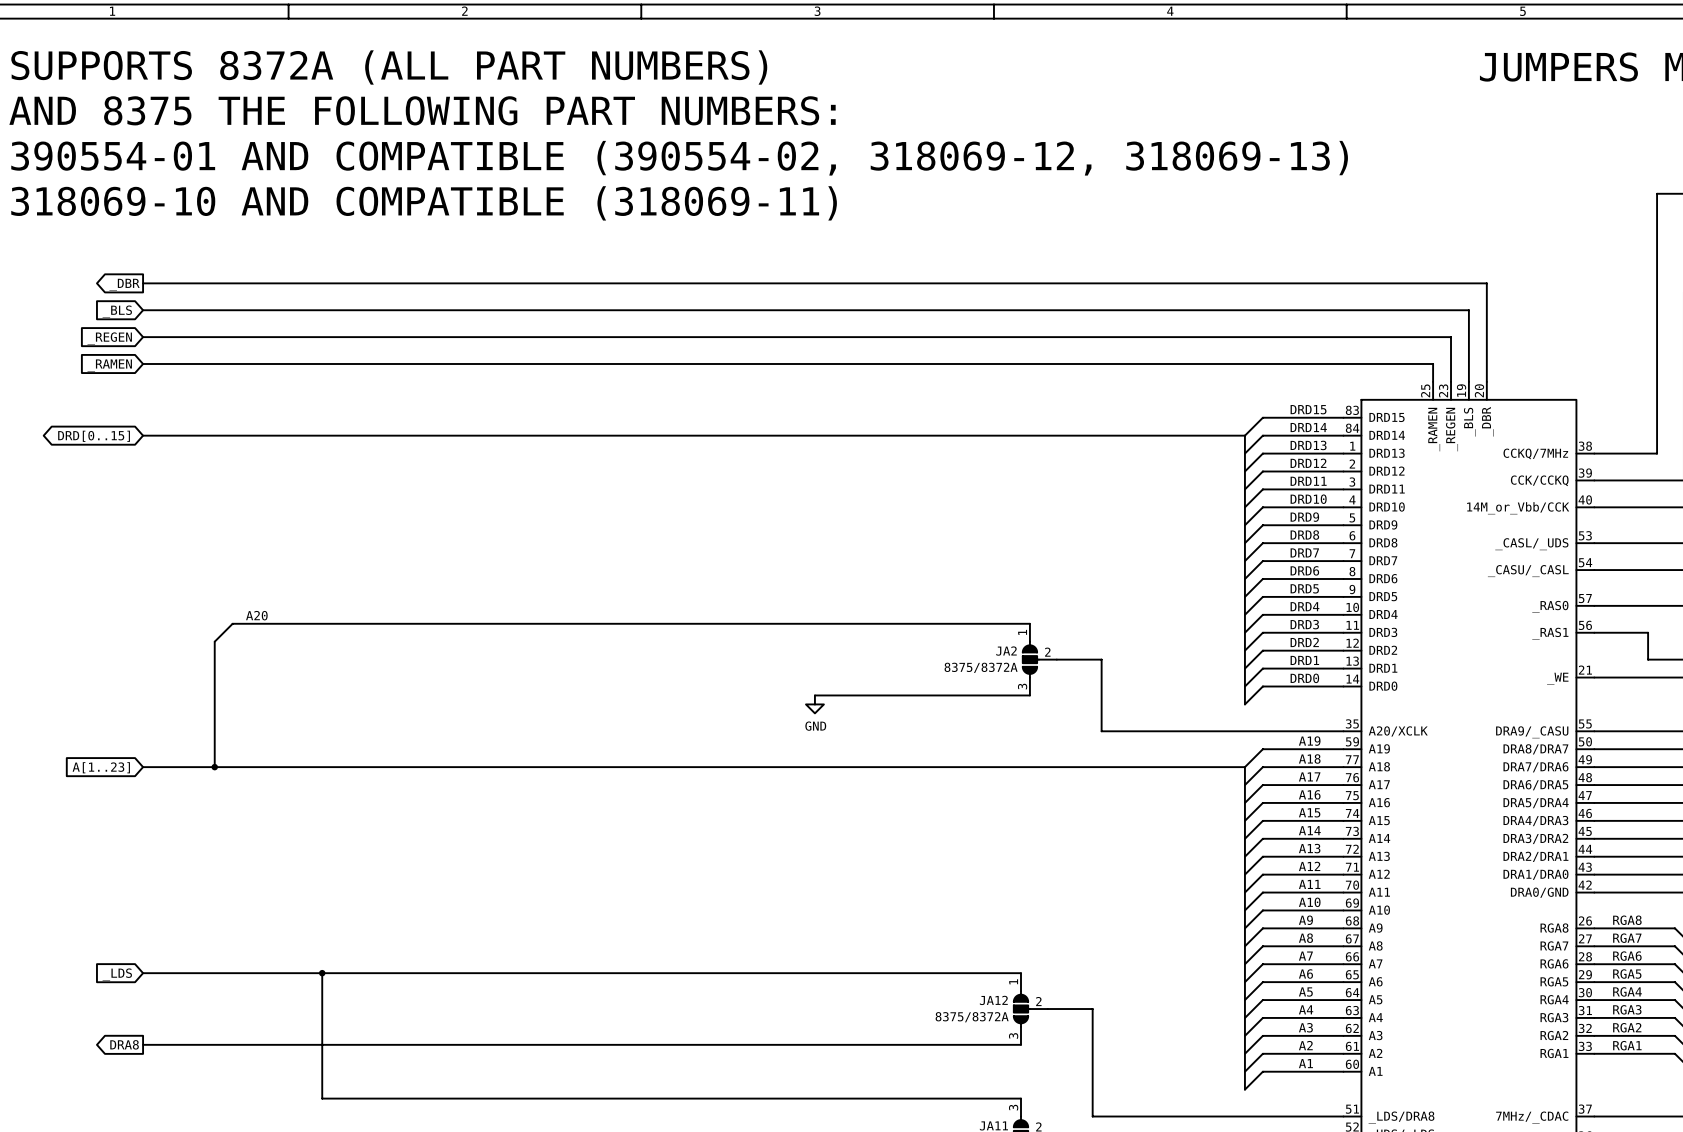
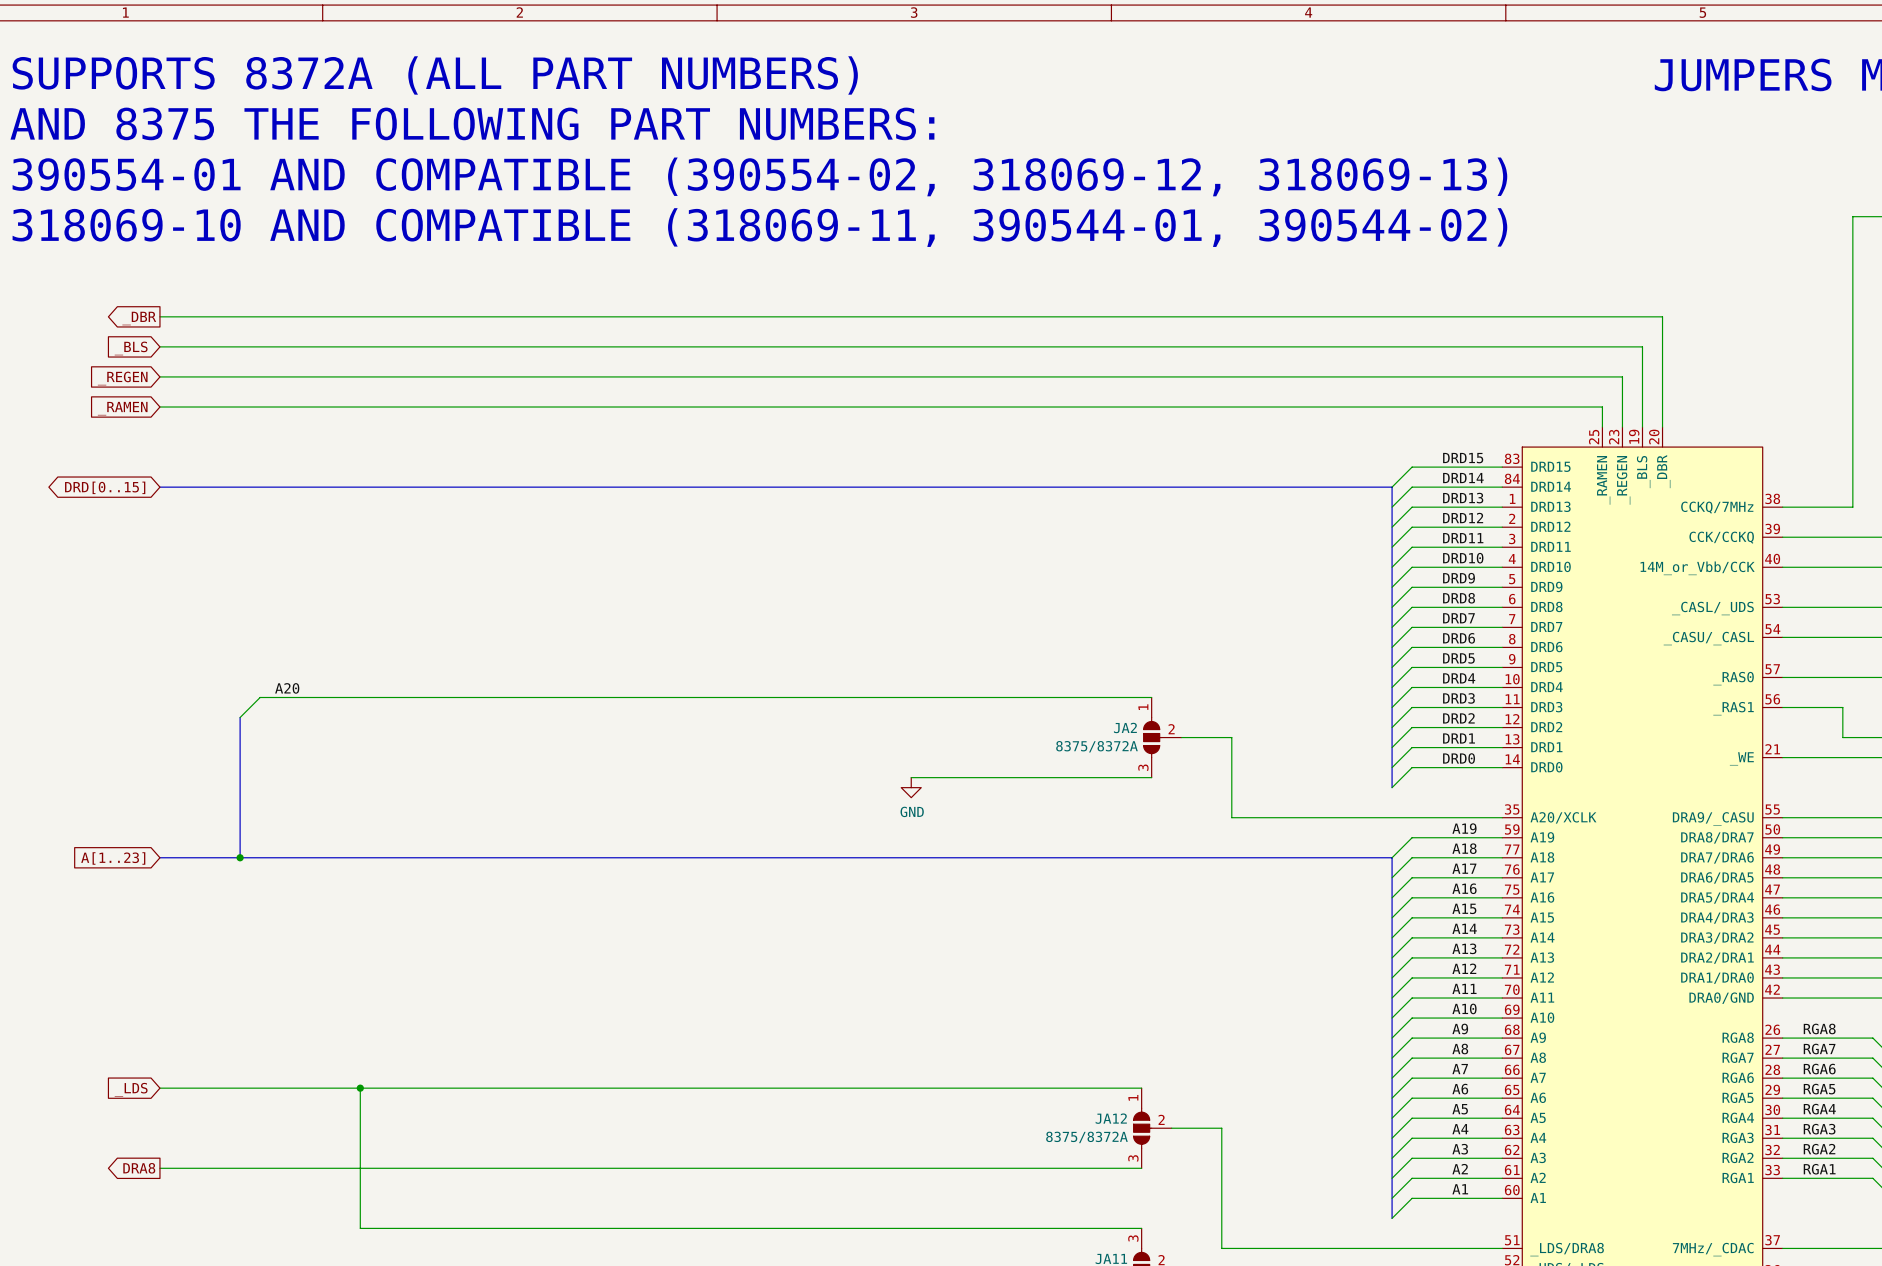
text: 318069-10 AND COMPATIBLE (318069-11) (424, 203) -> 318069-10 AND COMPATIBLE (318069-11, 390544-01, 390544-02) (759, 227)

